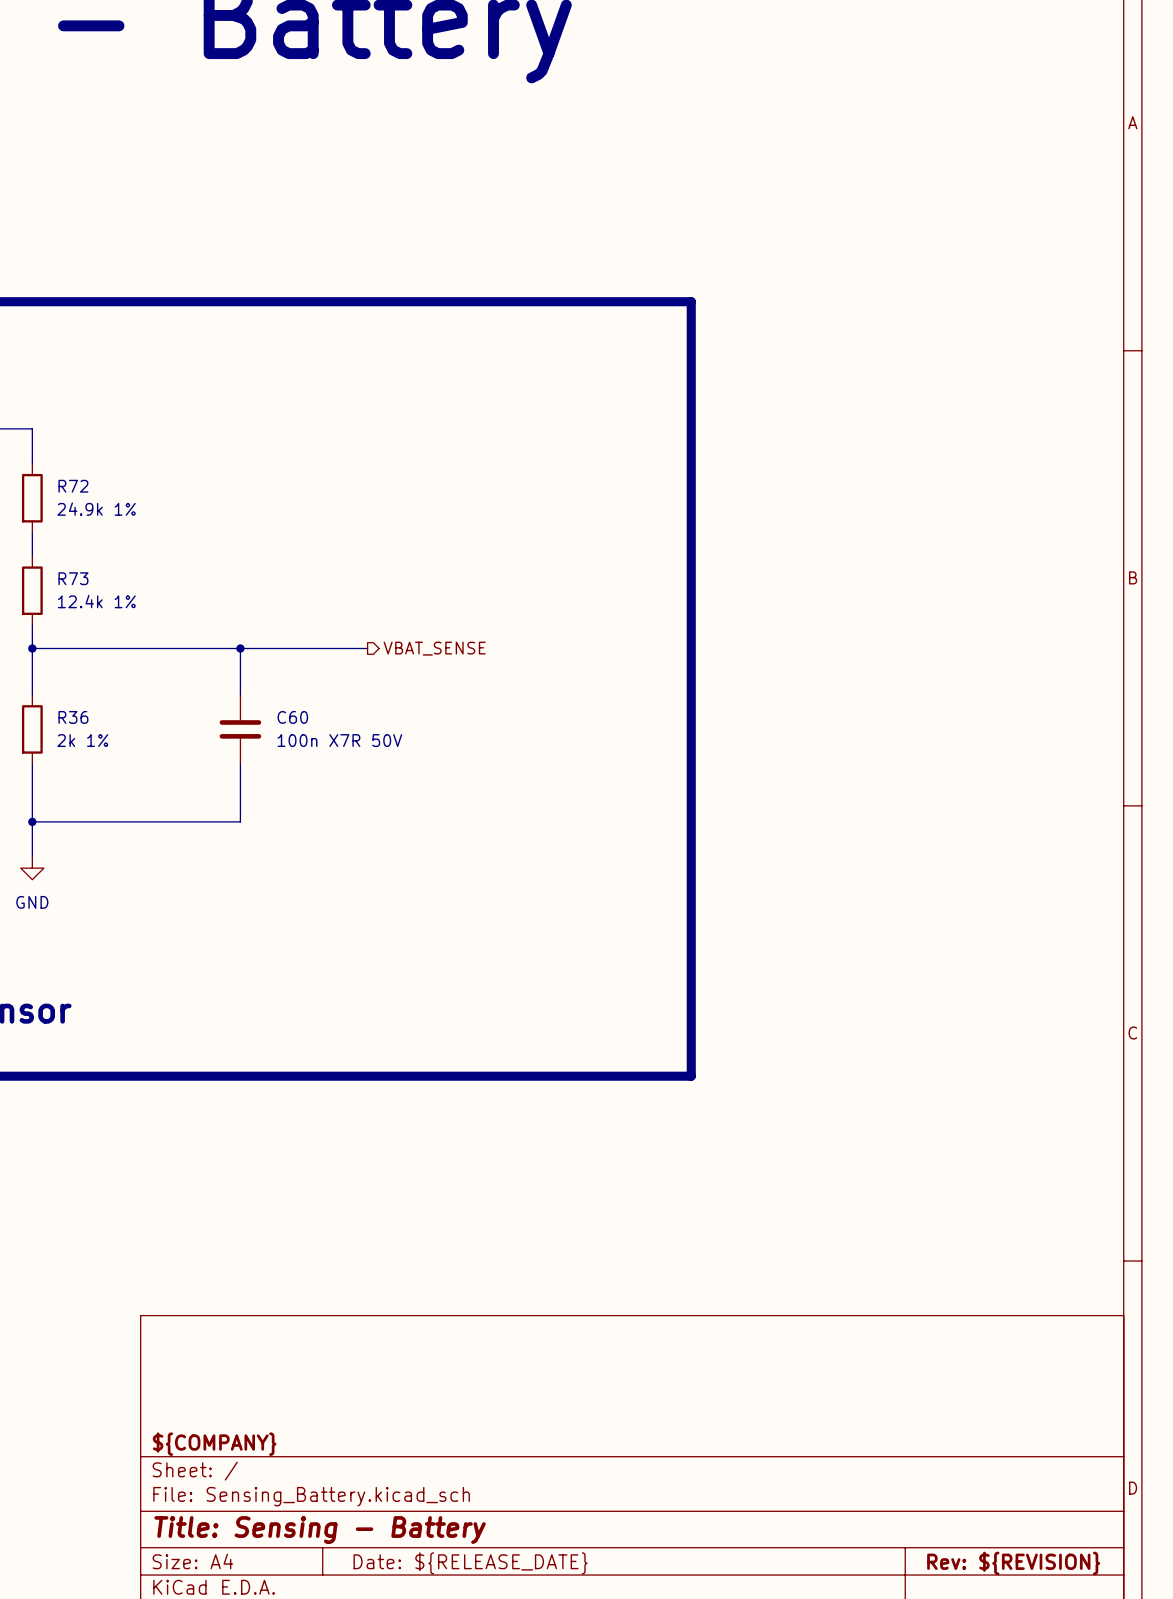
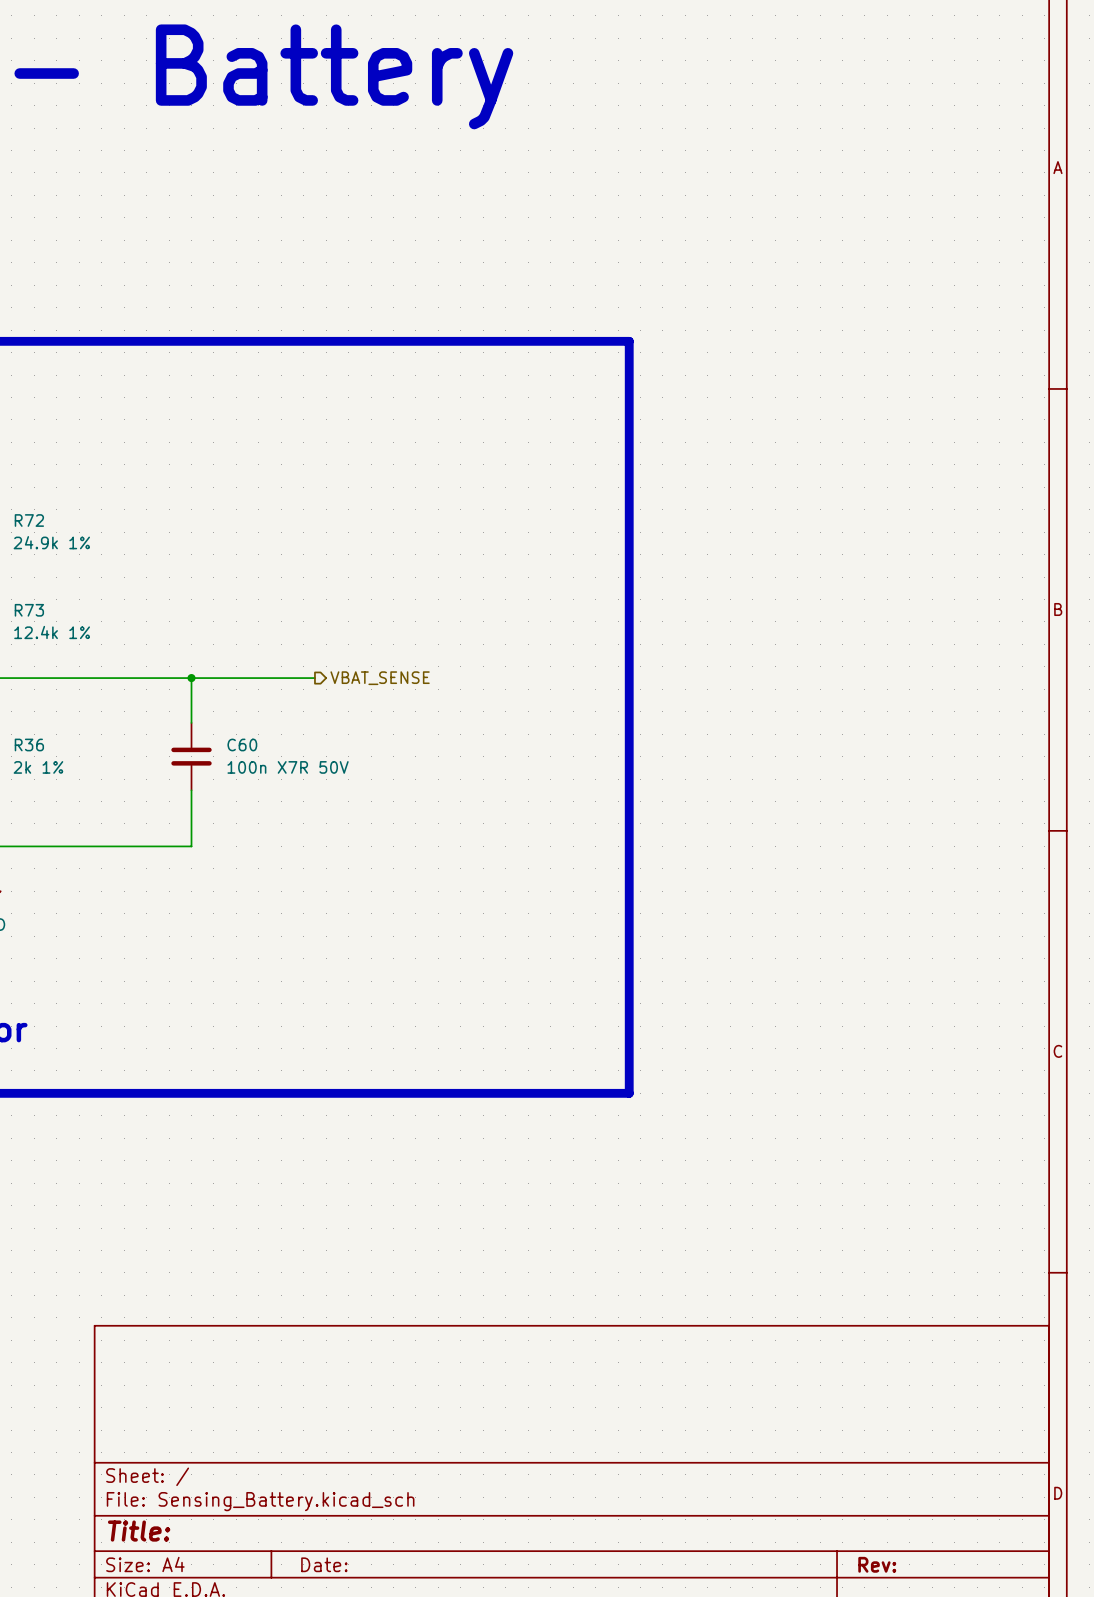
title block: ${COMPANY} (214, 1444) -> none
title block: Title: Sensing - Battery (320, 1530) -> Title: (139, 1531)
title block: Date: ${RELEASE_DATE} (470, 1563) -> Date: (324, 1564)
title block: Rev: ${REVISION} (1013, 1563) -> Rev: (877, 1564)

